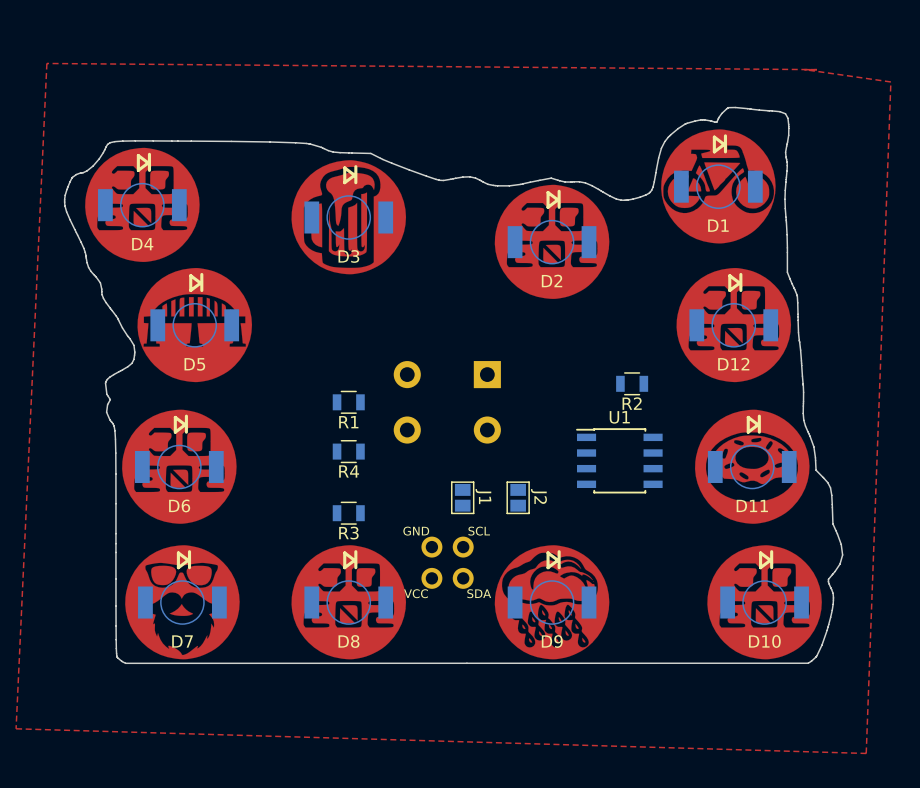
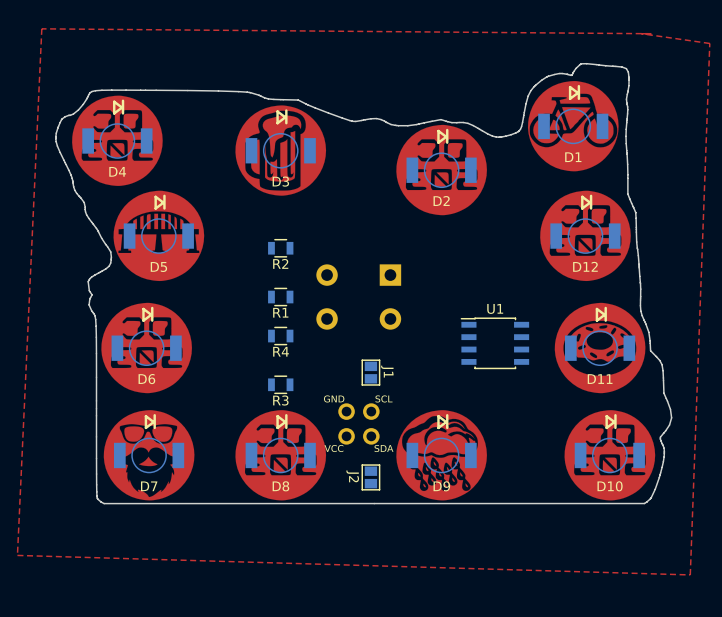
R2 position: (632, 383) -> (280, 248)
J2 name position: J2 (538, 496) -> J2 (352, 476)
J2 position: (518, 497) -> (370, 477)

